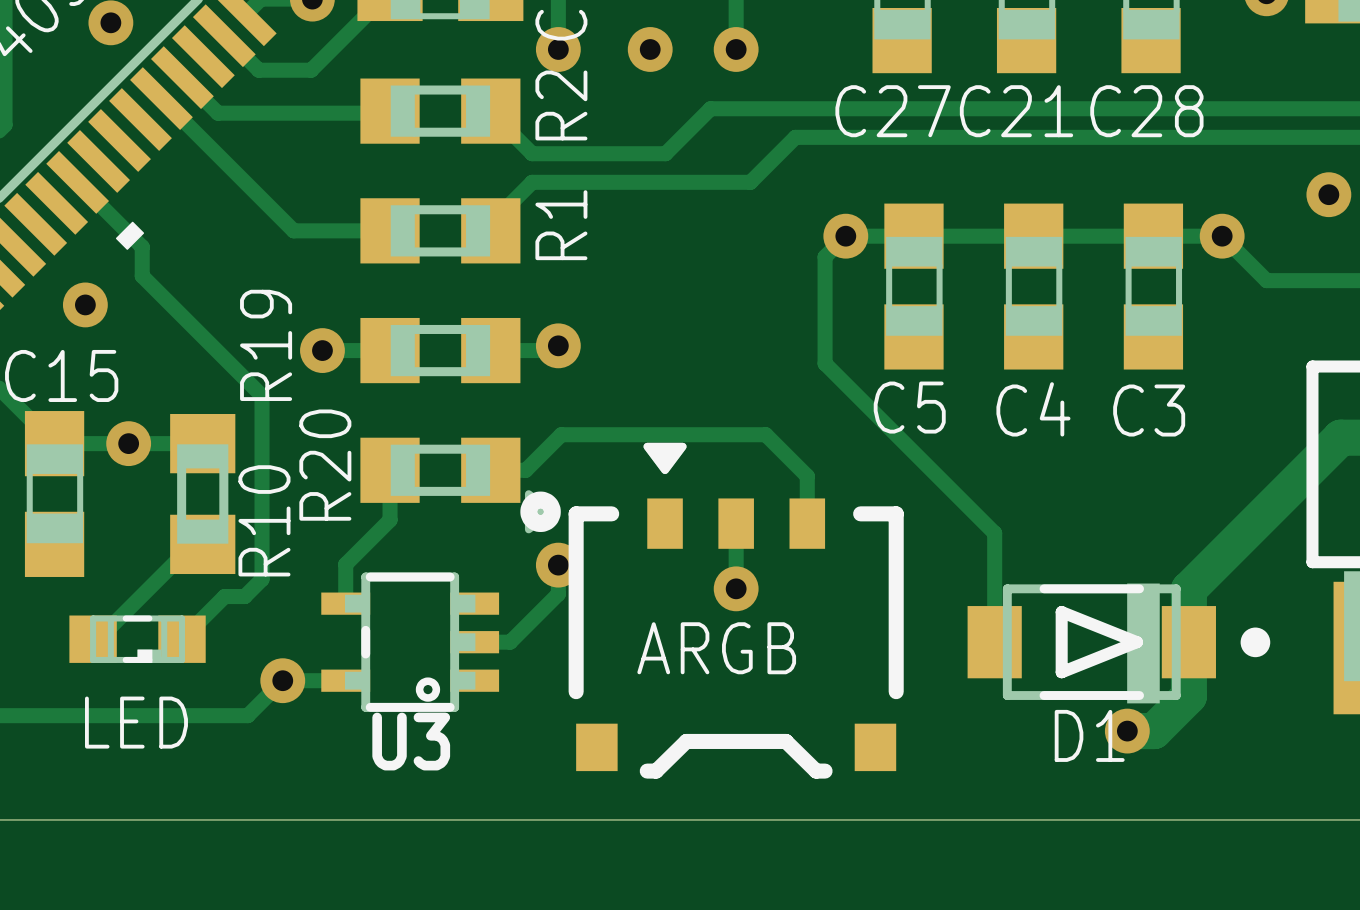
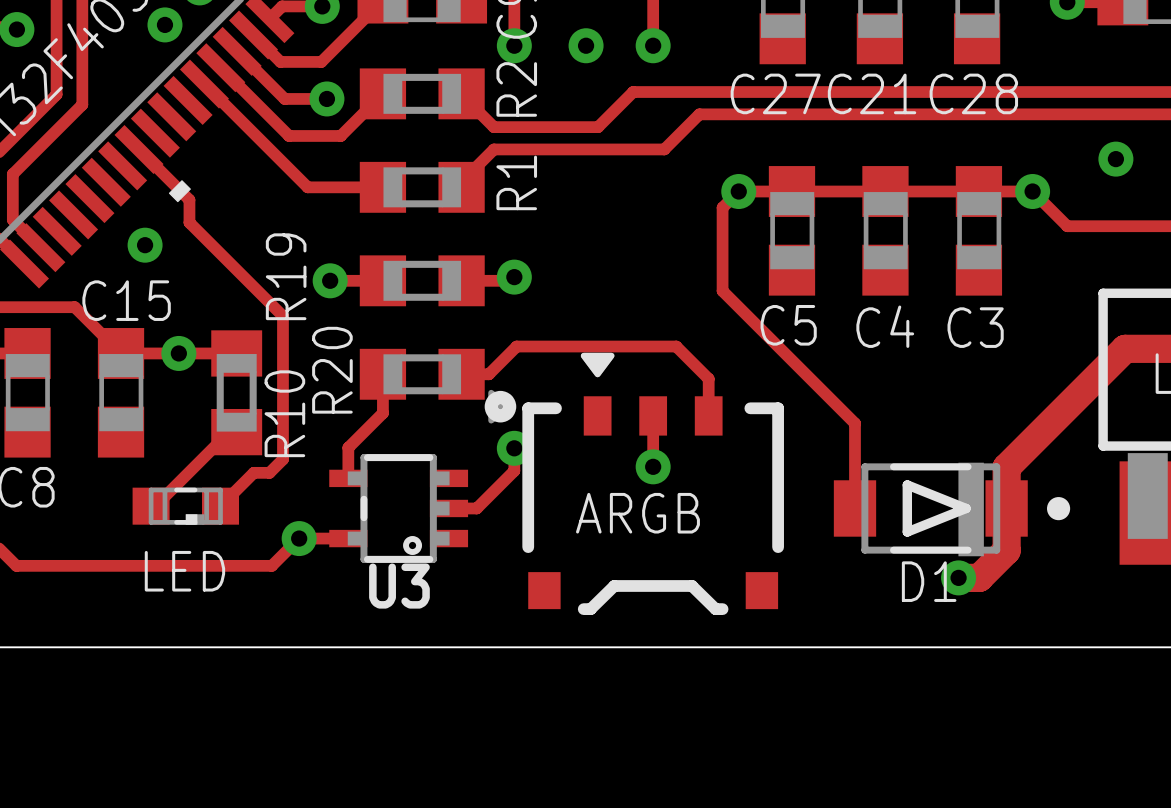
track: none -> (237, 51) (284, 98) (326, 98)
track: (217, 113) (387, 113) -> (248, 95) (289, 135) (340, 135) (381, 95)
via: none -> (326, 98)

